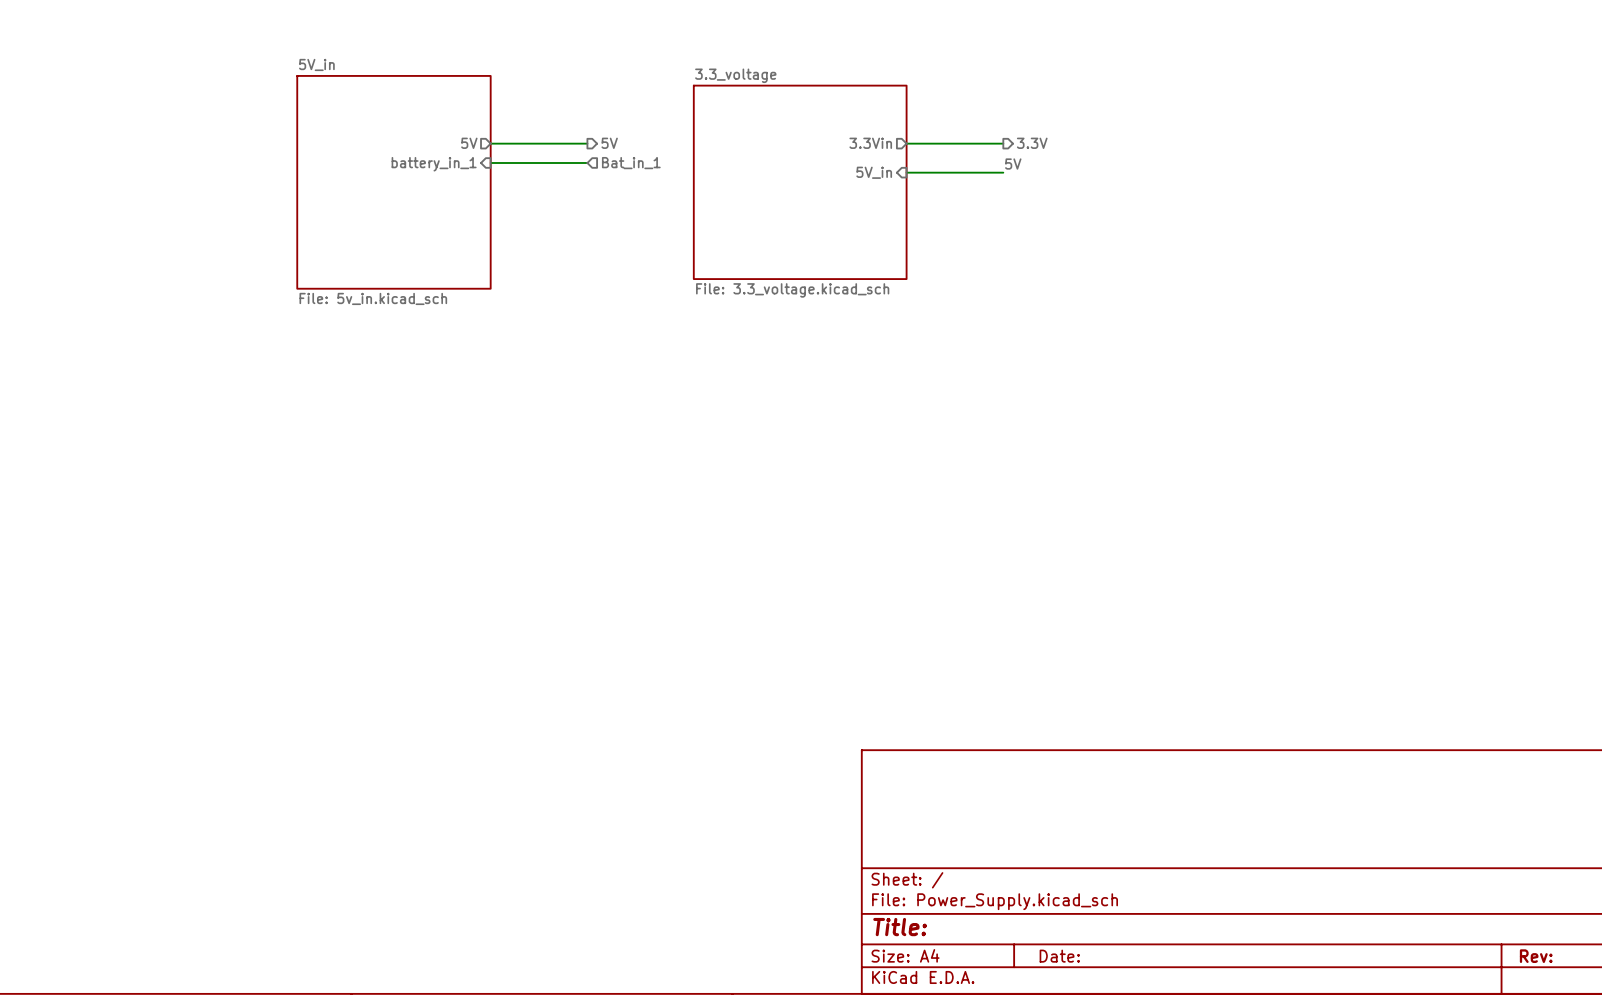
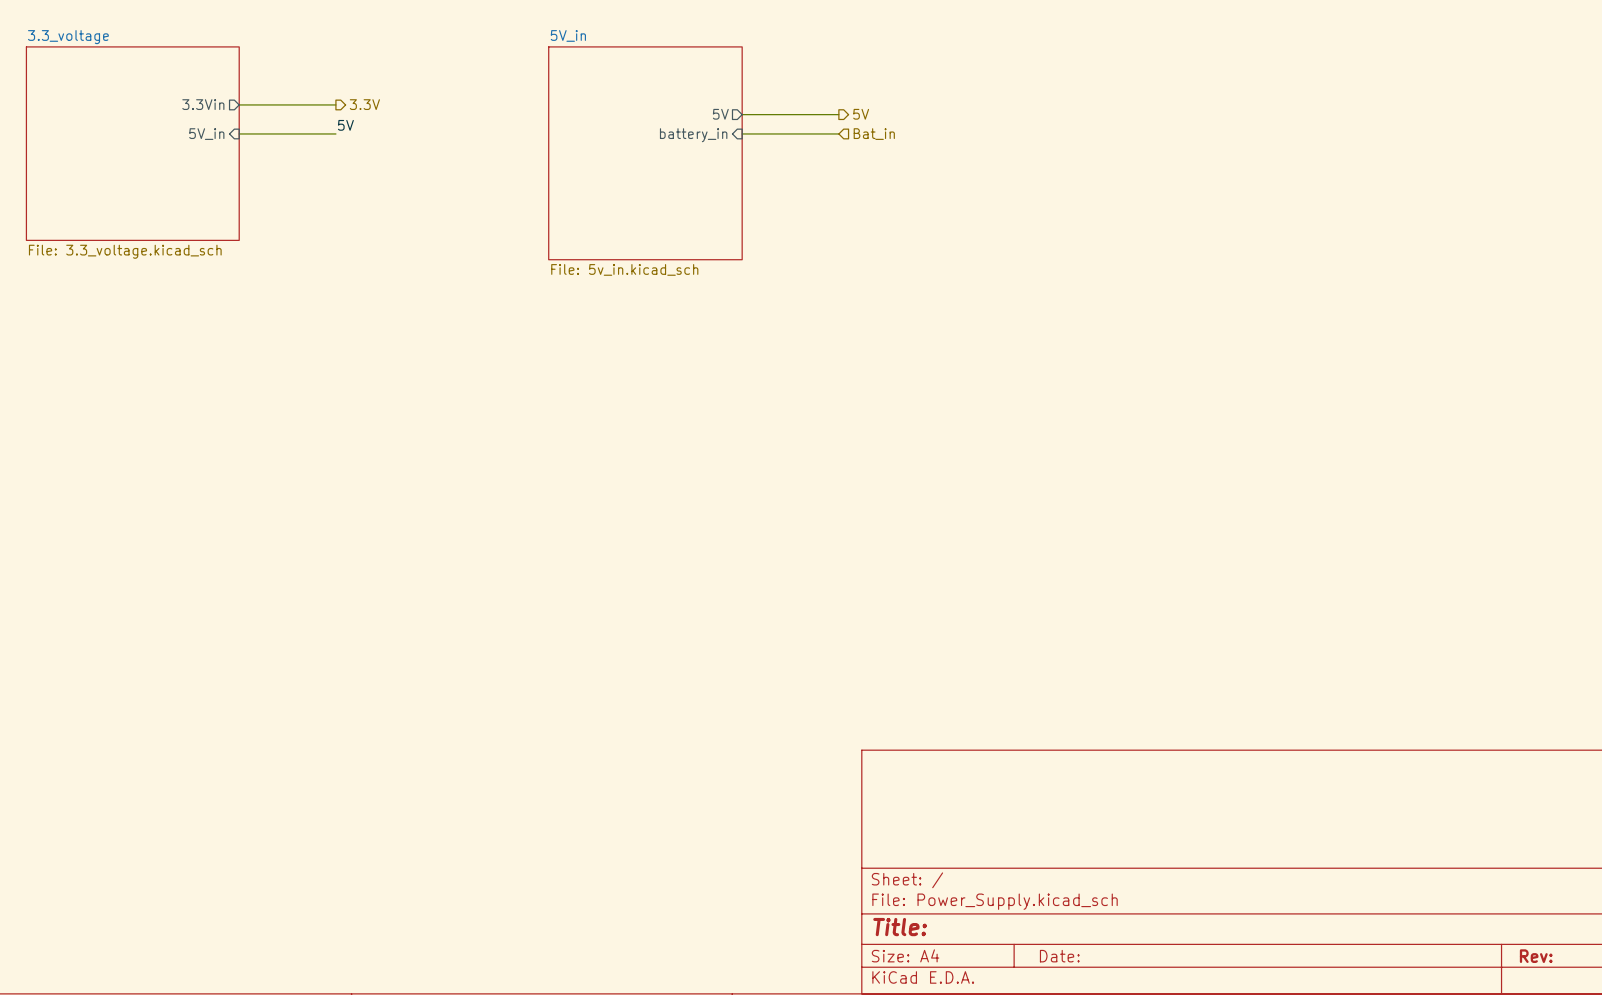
sheet pin: none -> 3.3Vin (203, 104)
wire: none -> (239, 104) (335, 104)
hierarchical label: none -> 3.3V (364, 104)
sheet pin: none -> 5V (720, 114)
hierarchical label: none -> 5V (861, 114)
label: none -> 5V (345, 125)
wire: none -> (239, 133) (335, 133)
sheet pin: none -> 5V_in (206, 134)
hierarchical label: none -> Bat_in (874, 134)
sheet pin: none -> battery_in (693, 135)
sheet pin: 5V (469, 143) -> none
wire: (490, 143) (587, 143) -> none
hierarchical label: 5V (609, 143) -> none
sheet pin: 3.3Vin (870, 143) -> none
wire: (906, 143) (1003, 143) -> (742, 133) (838, 133)
hierarchical label: 3.3V (1032, 143) -> none
wire: (490, 162) (587, 162) -> none
hierarchical label: Bat_in_1 (631, 163) -> none
sheet pin: battery_in_1 (434, 164) -> none
label: 5V (1013, 164) -> none
sheet pin: 5V_in (874, 172) -> none
wire: (906, 172) (1003, 172) -> (742, 114) (838, 114)
sheet 5V_in position: (393, 182) -> (645, 153)
sheet 3.3_voltage position: (800, 182) -> (132, 143)

